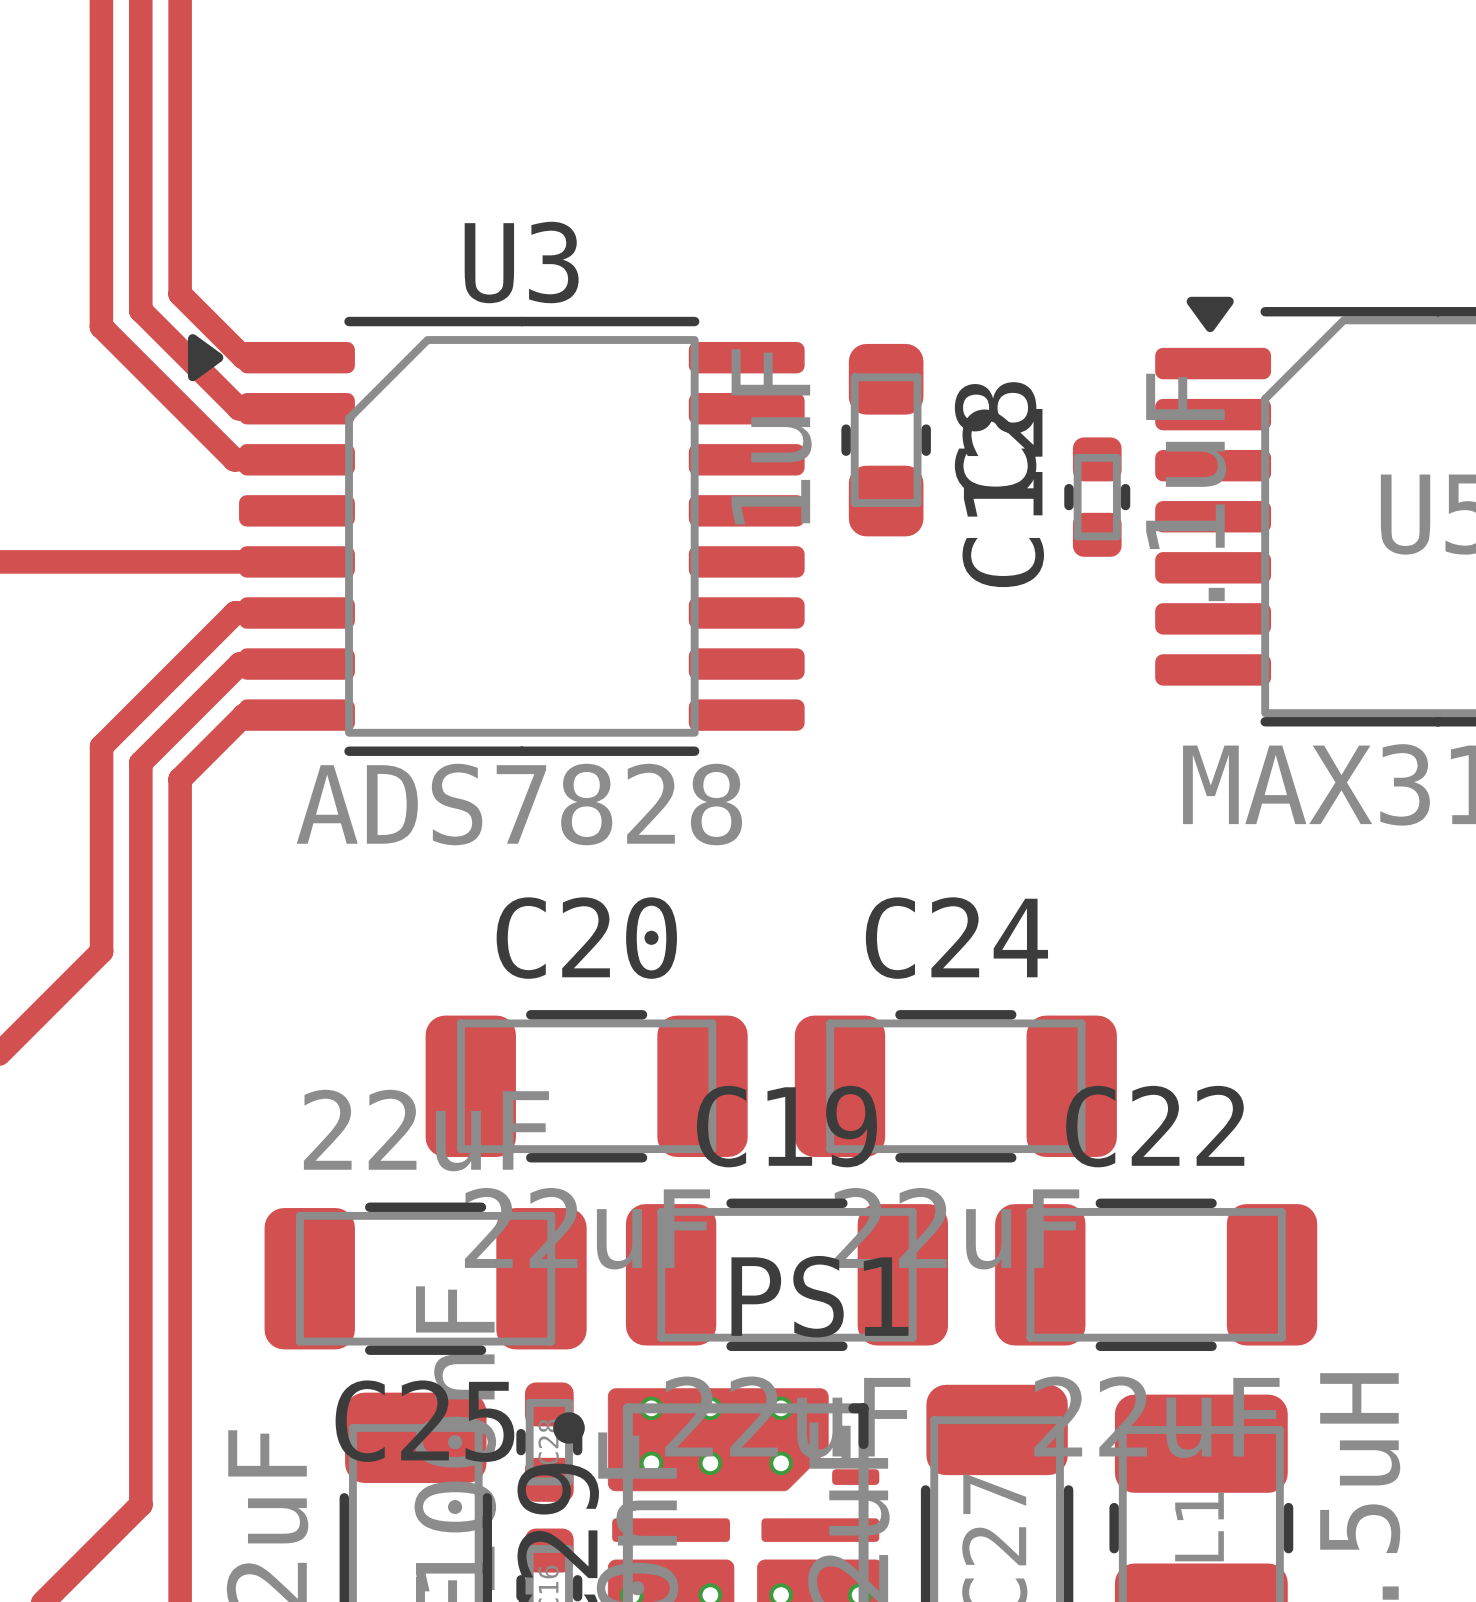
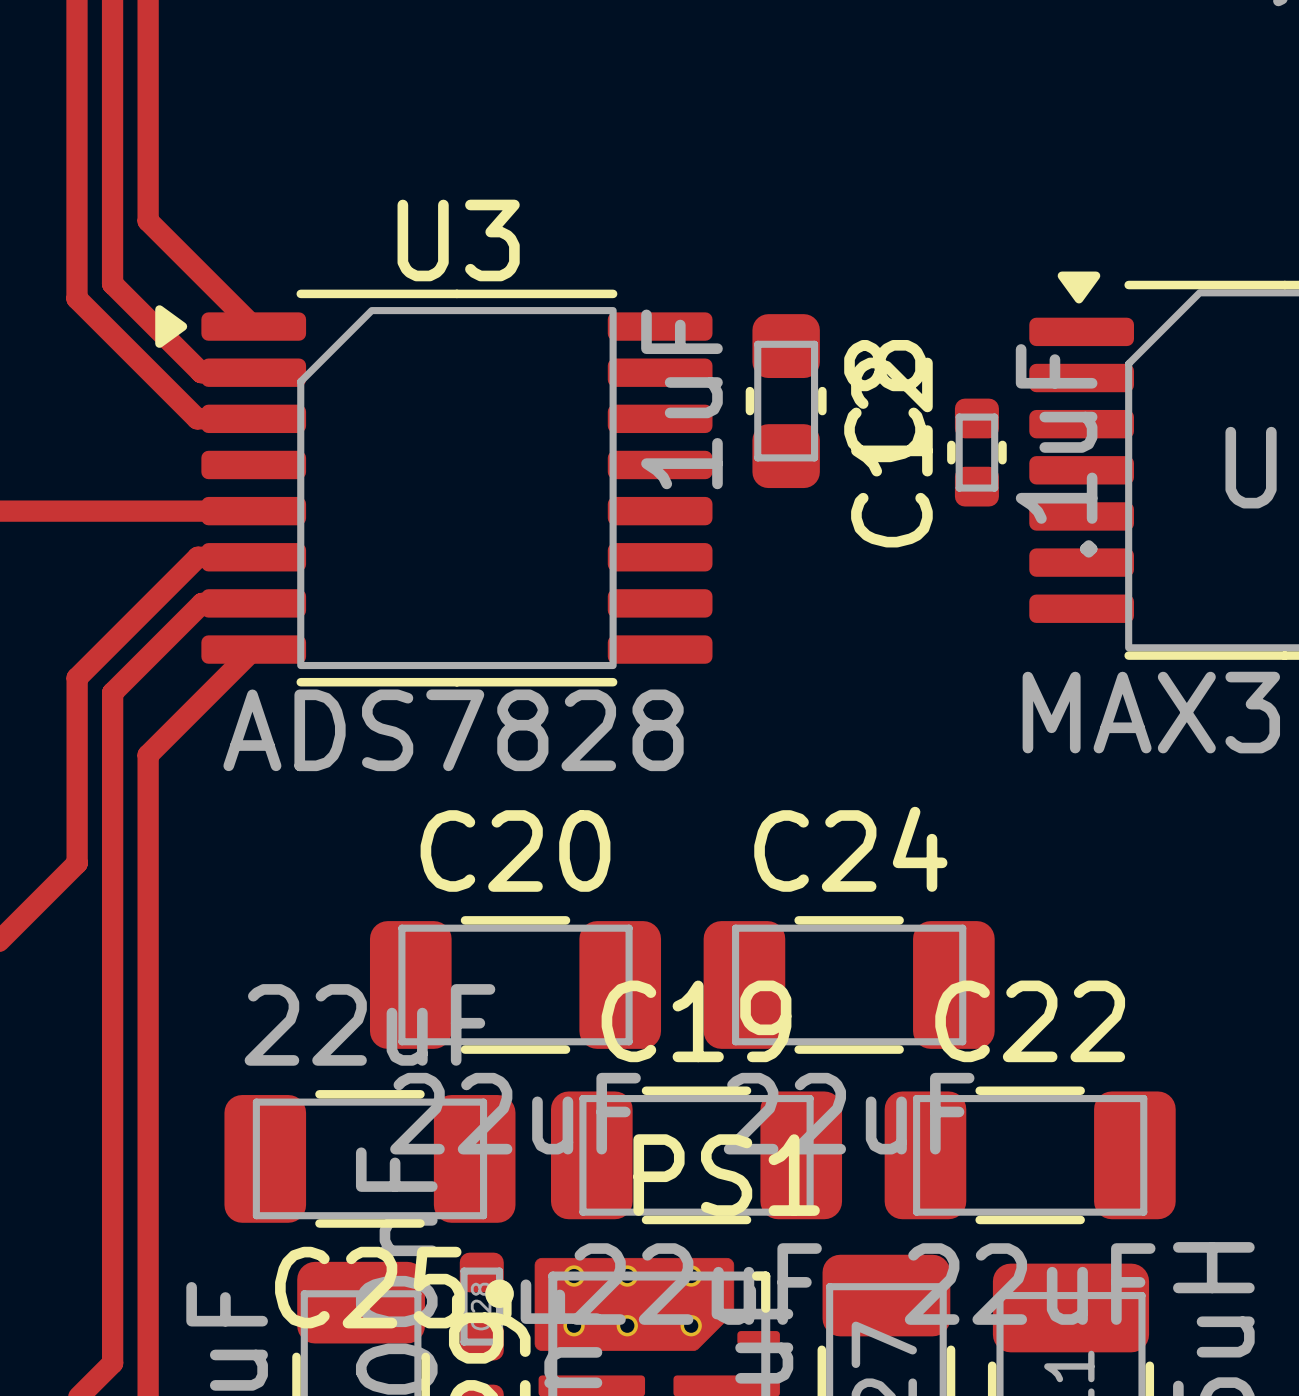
track: (180, 240) (180, 294) (243, 357) (296, 357) -> (148, 220) (253, 326)
track: (296, 715) (244, 715) (180, 779) (180, 831) -> (253, 649) (148, 755)

